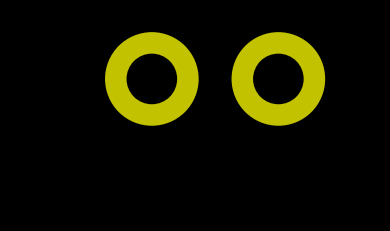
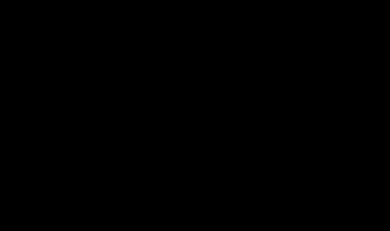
part: (215, 78) -> none

